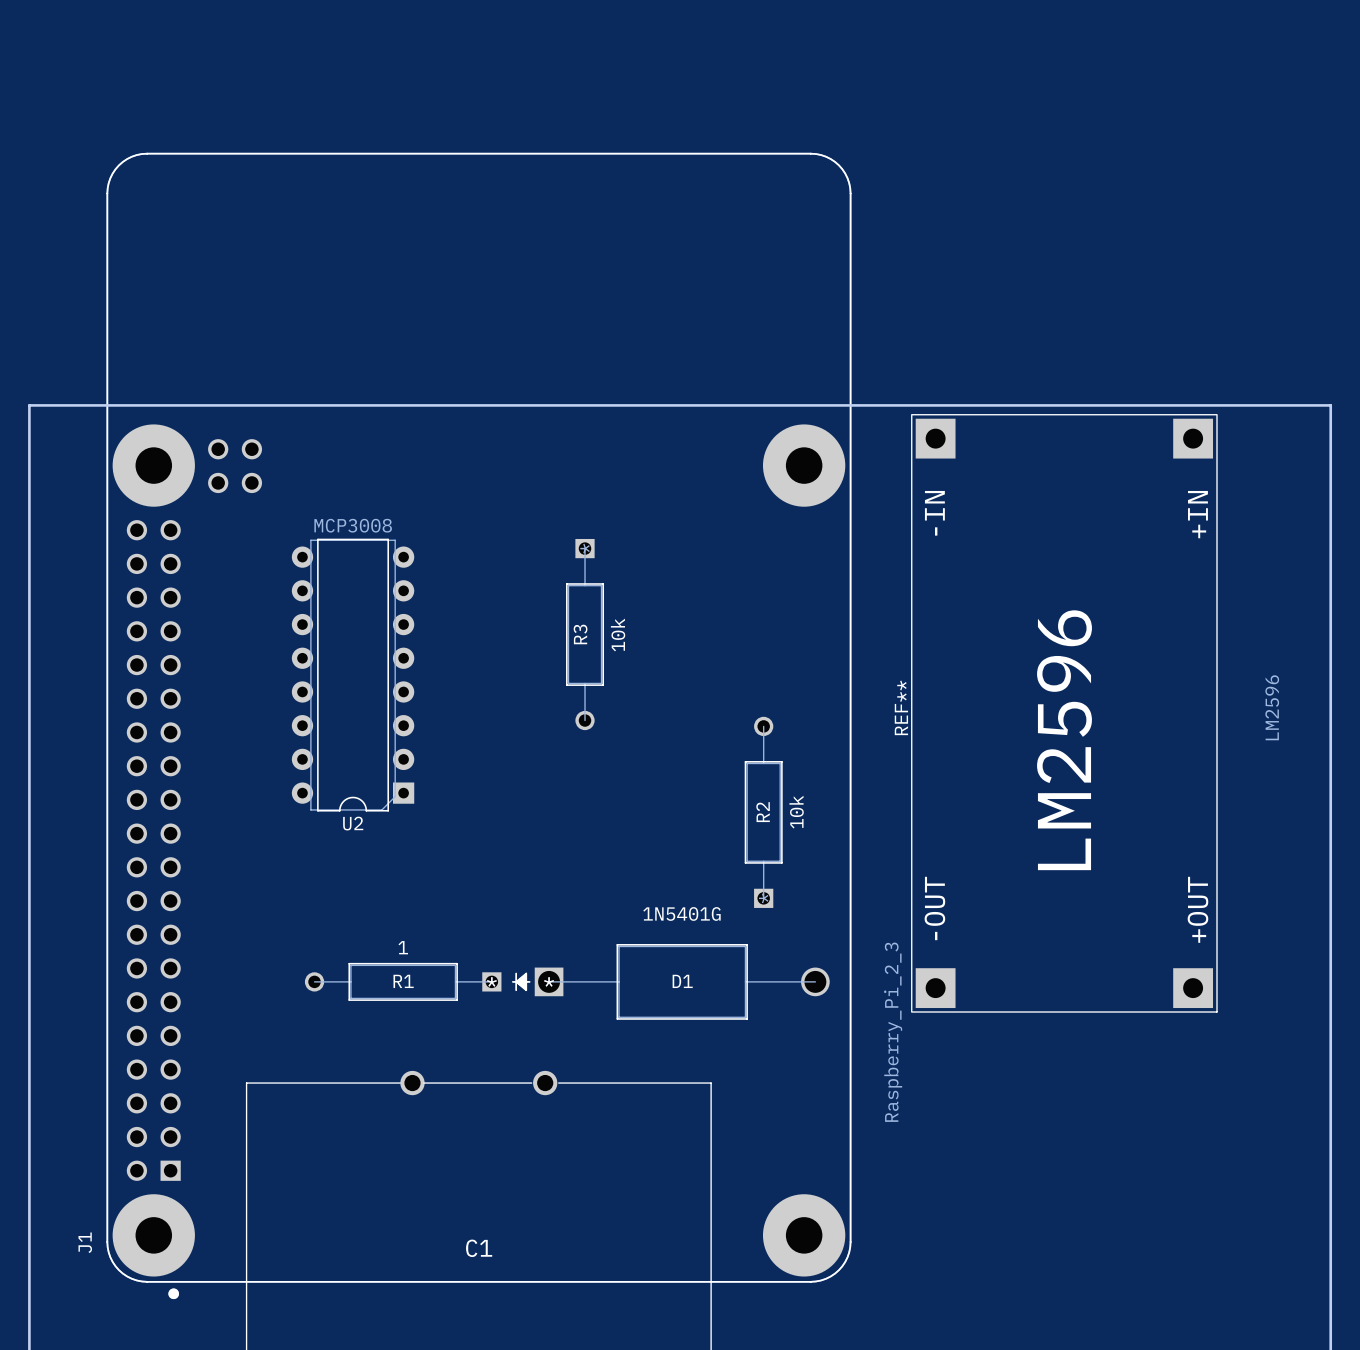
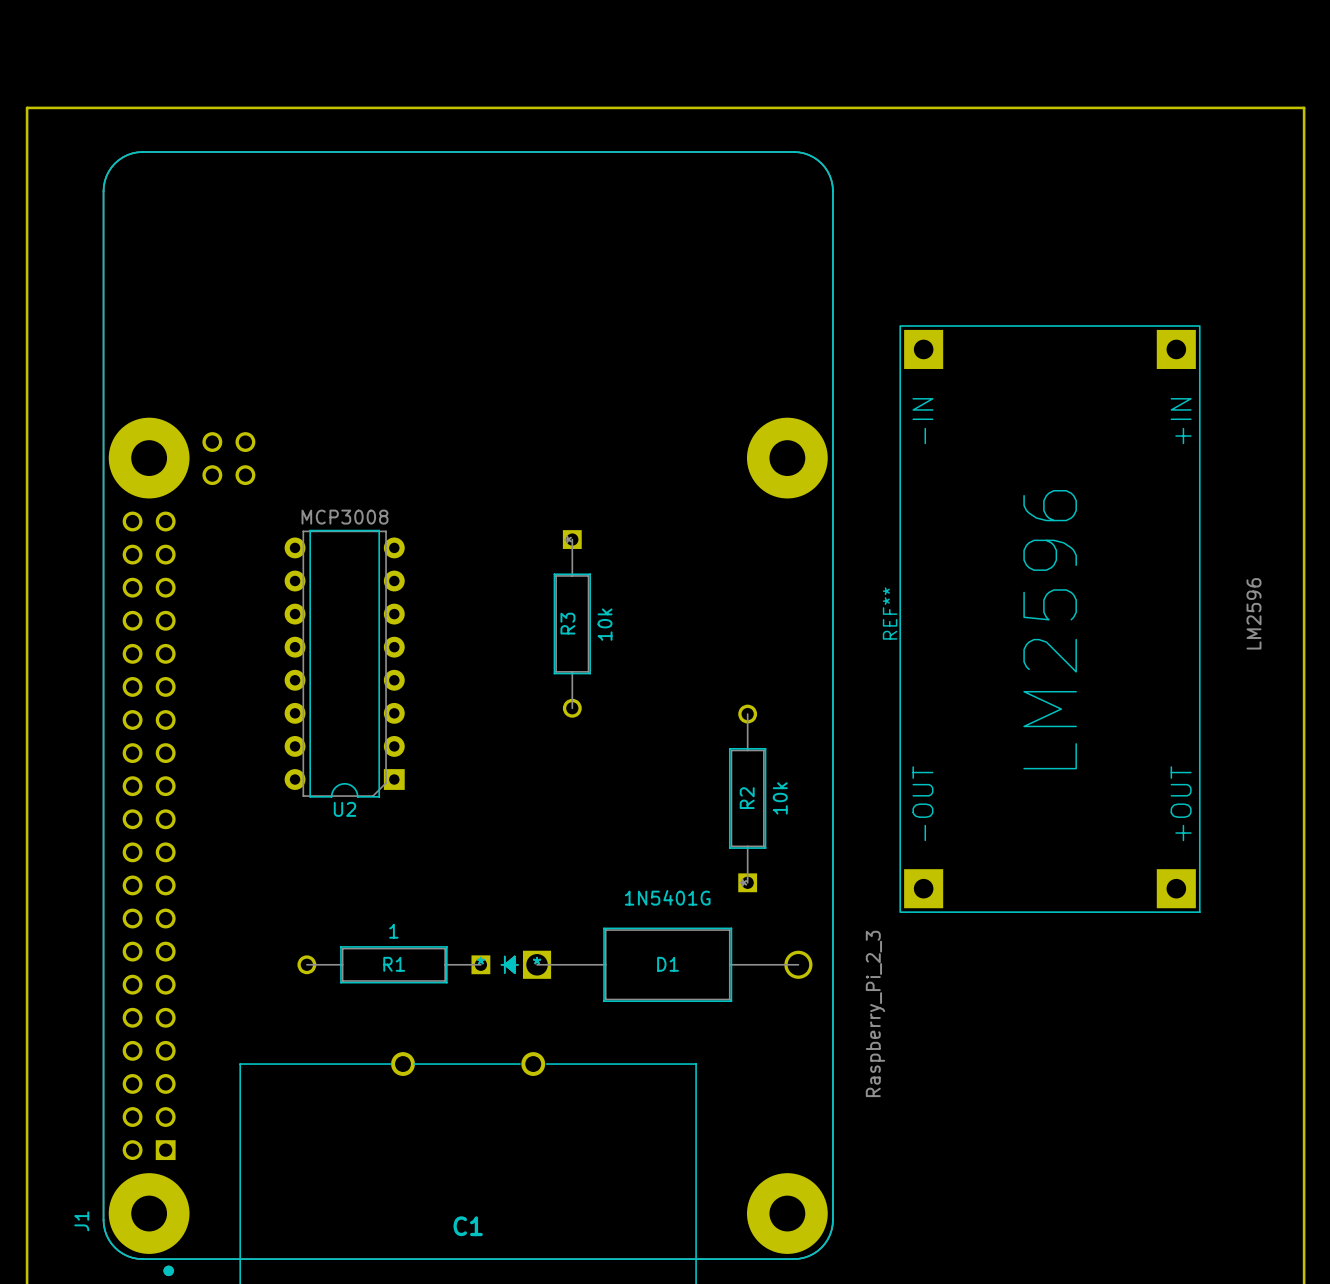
board edge: (29, 405) (1330, 405) -> (27, 399) (27, 107) (1304, 107) (1304, 399)
REF** position: (1064, 713) -> (1049, 619)

